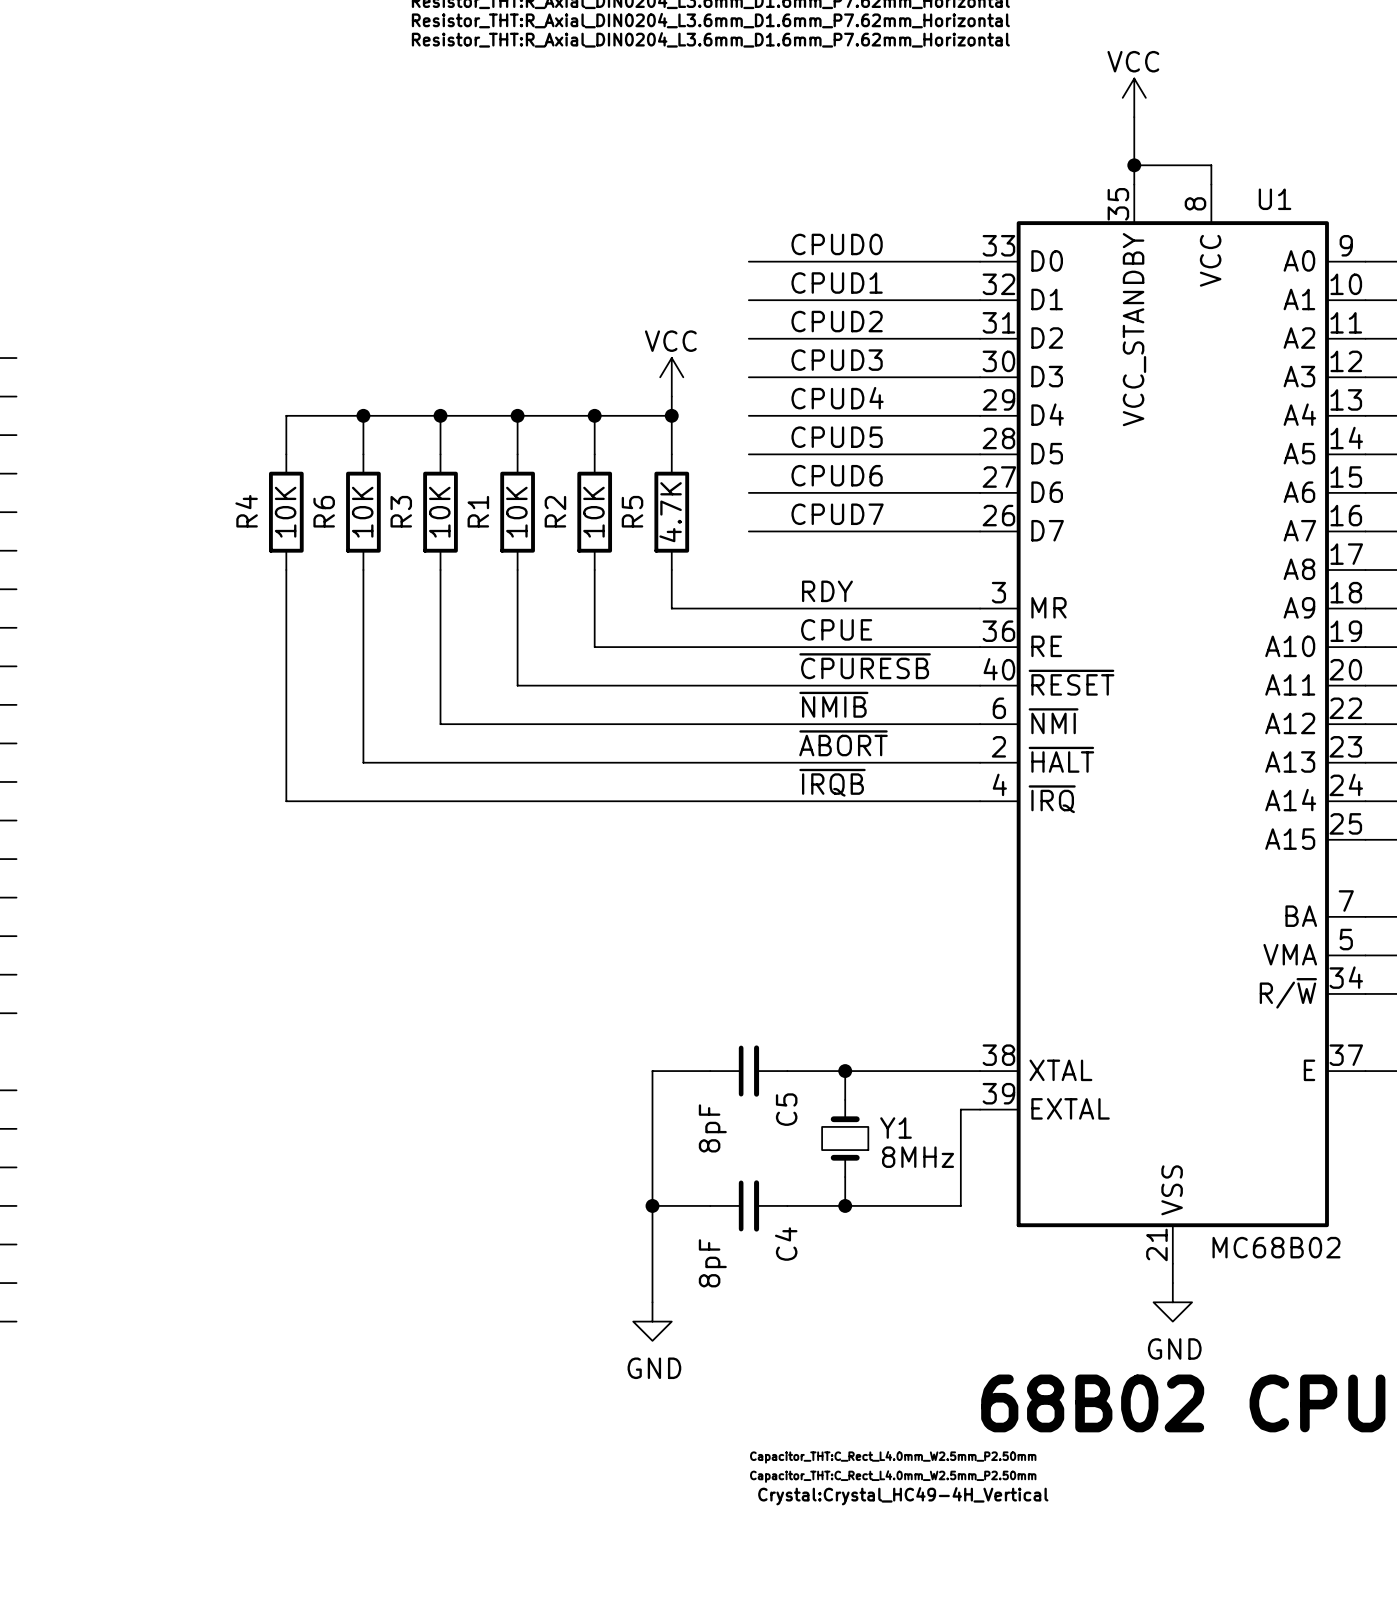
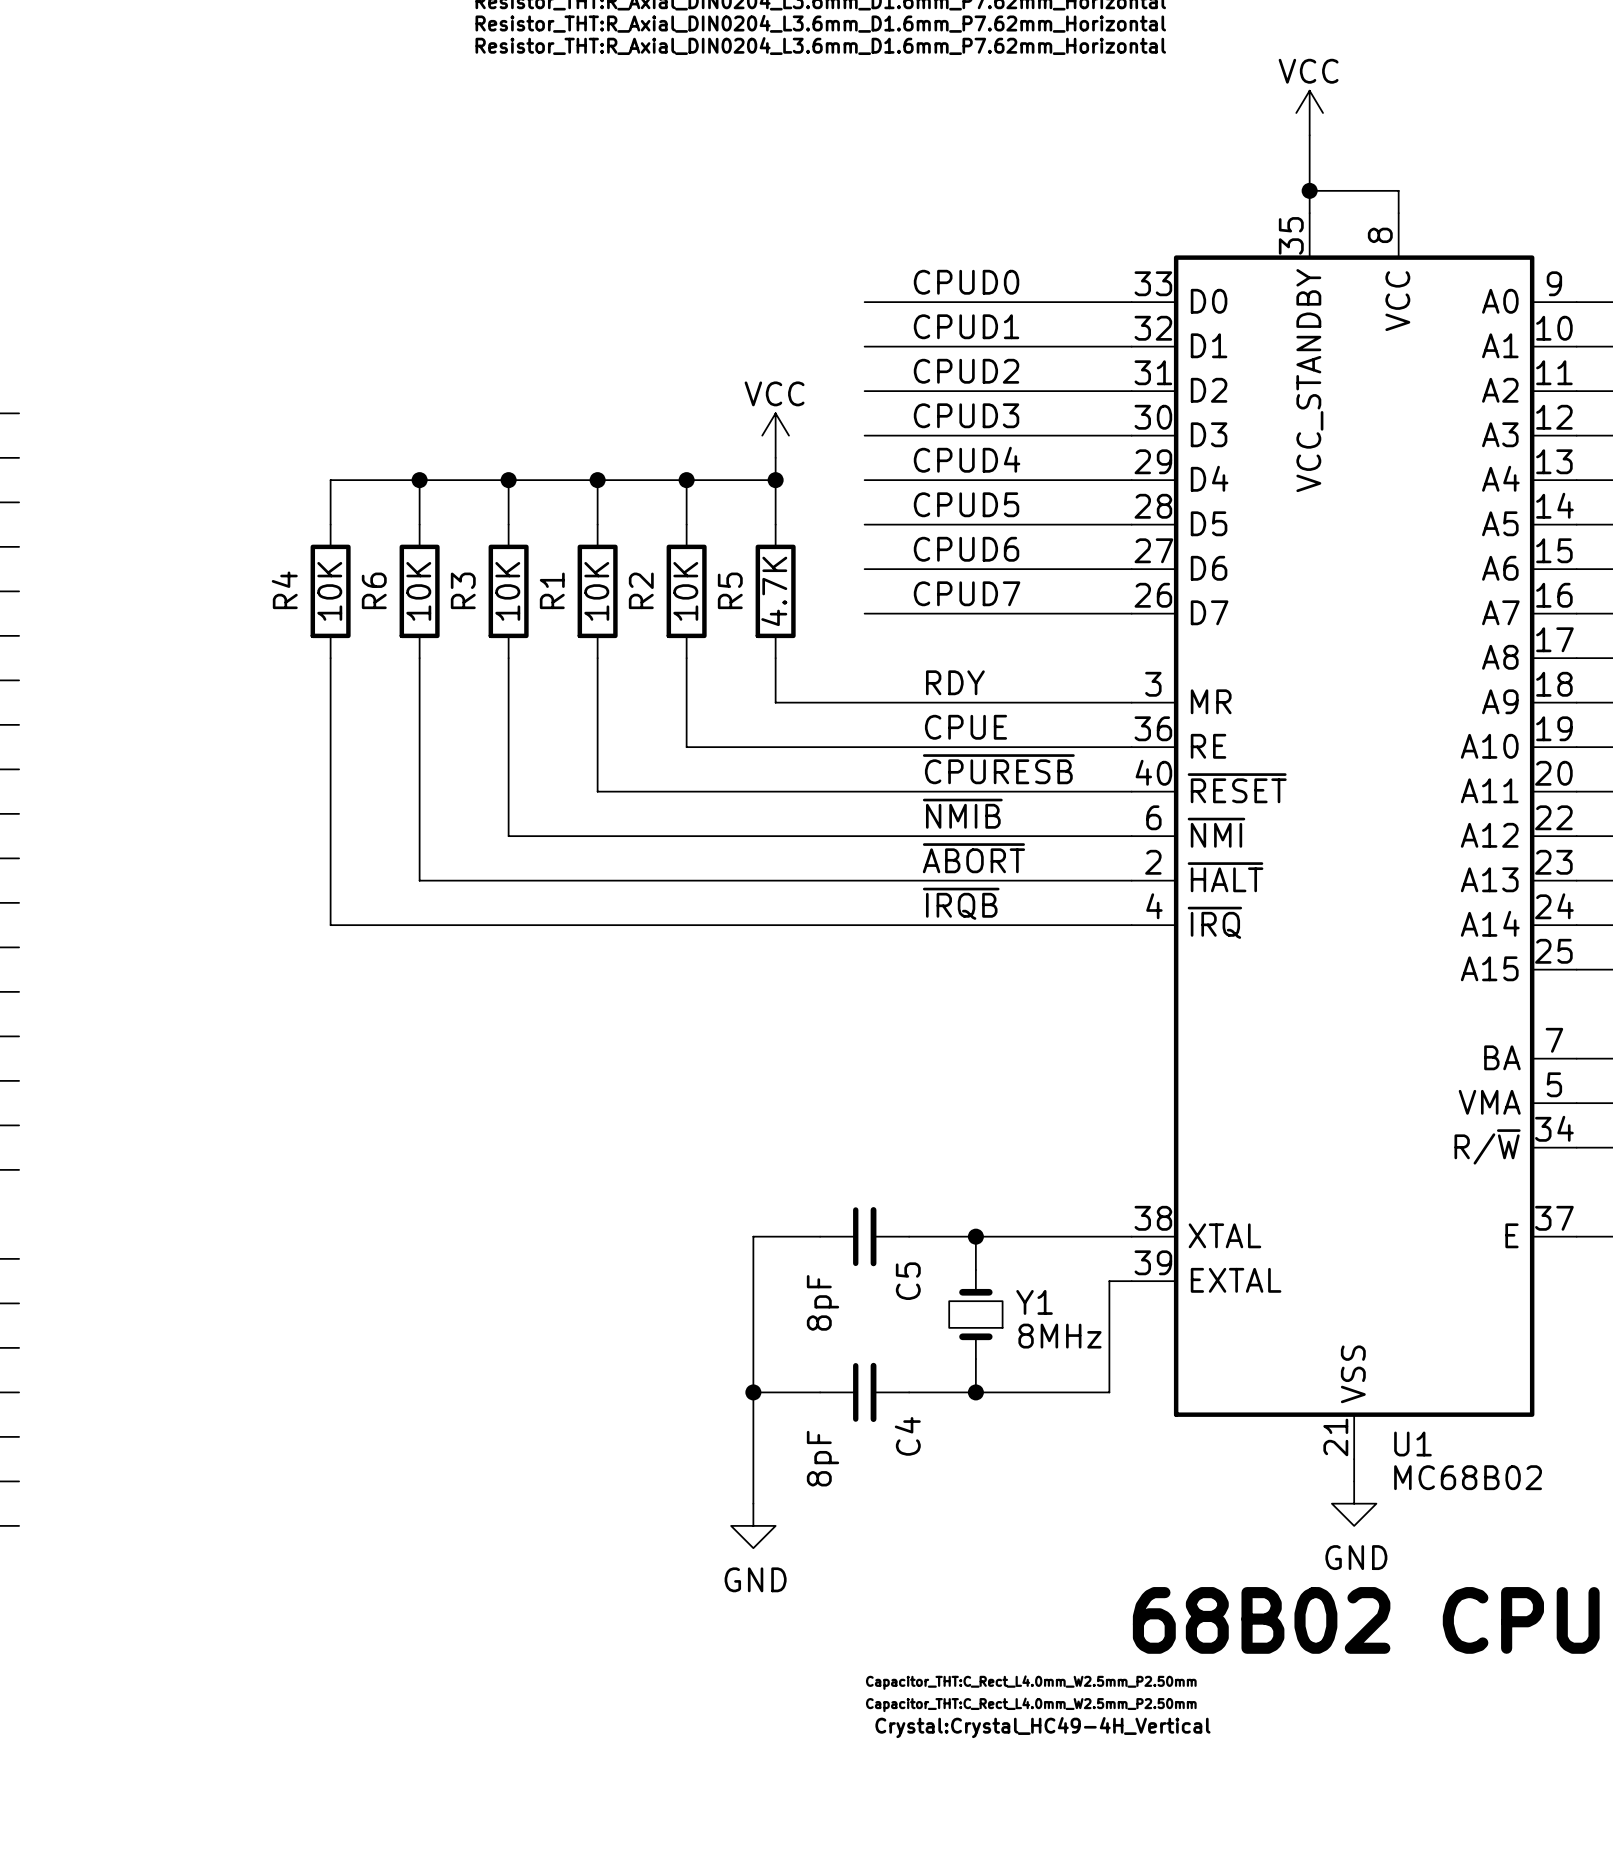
U1 name position: U1 (1275, 199) -> U1 (1412, 1444)
U1 value position: MC68B02 (1276, 1247) -> MC68B02 (1468, 1477)

